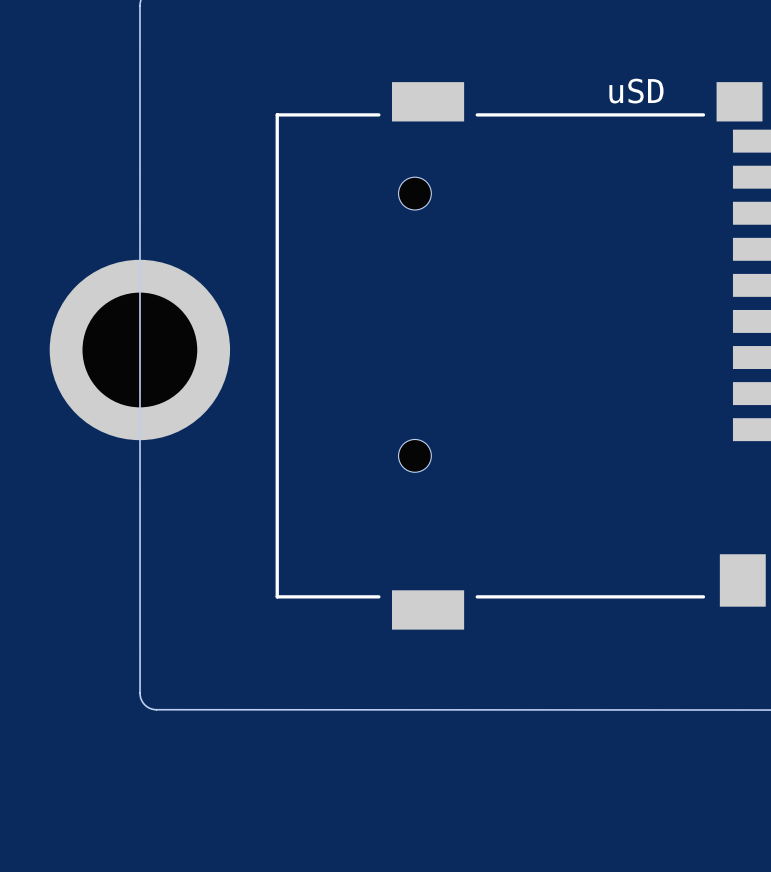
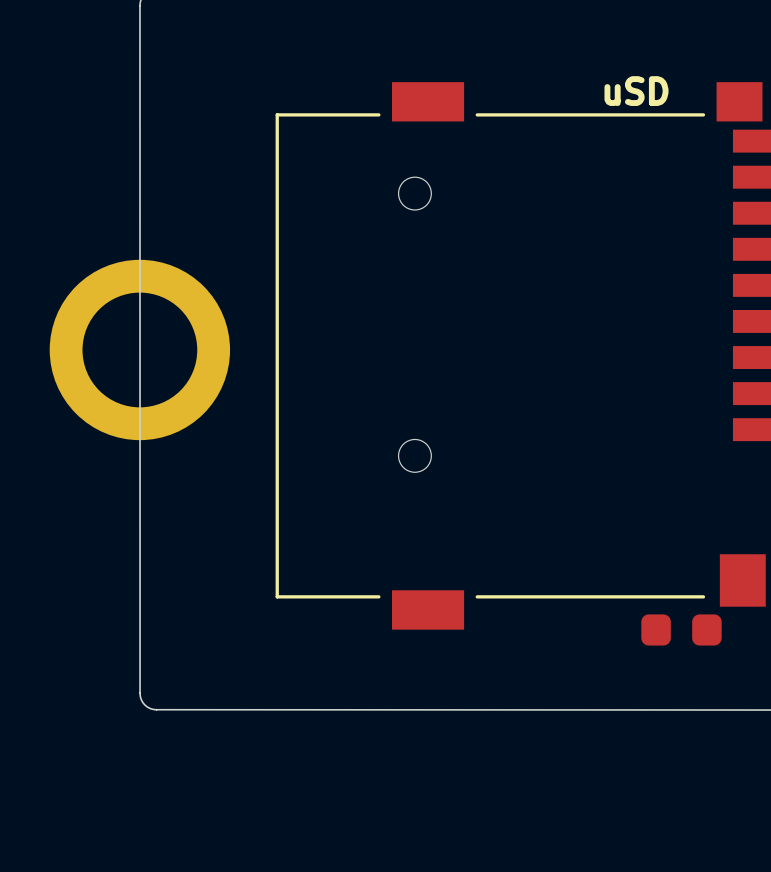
part: none -> (681, 629)

